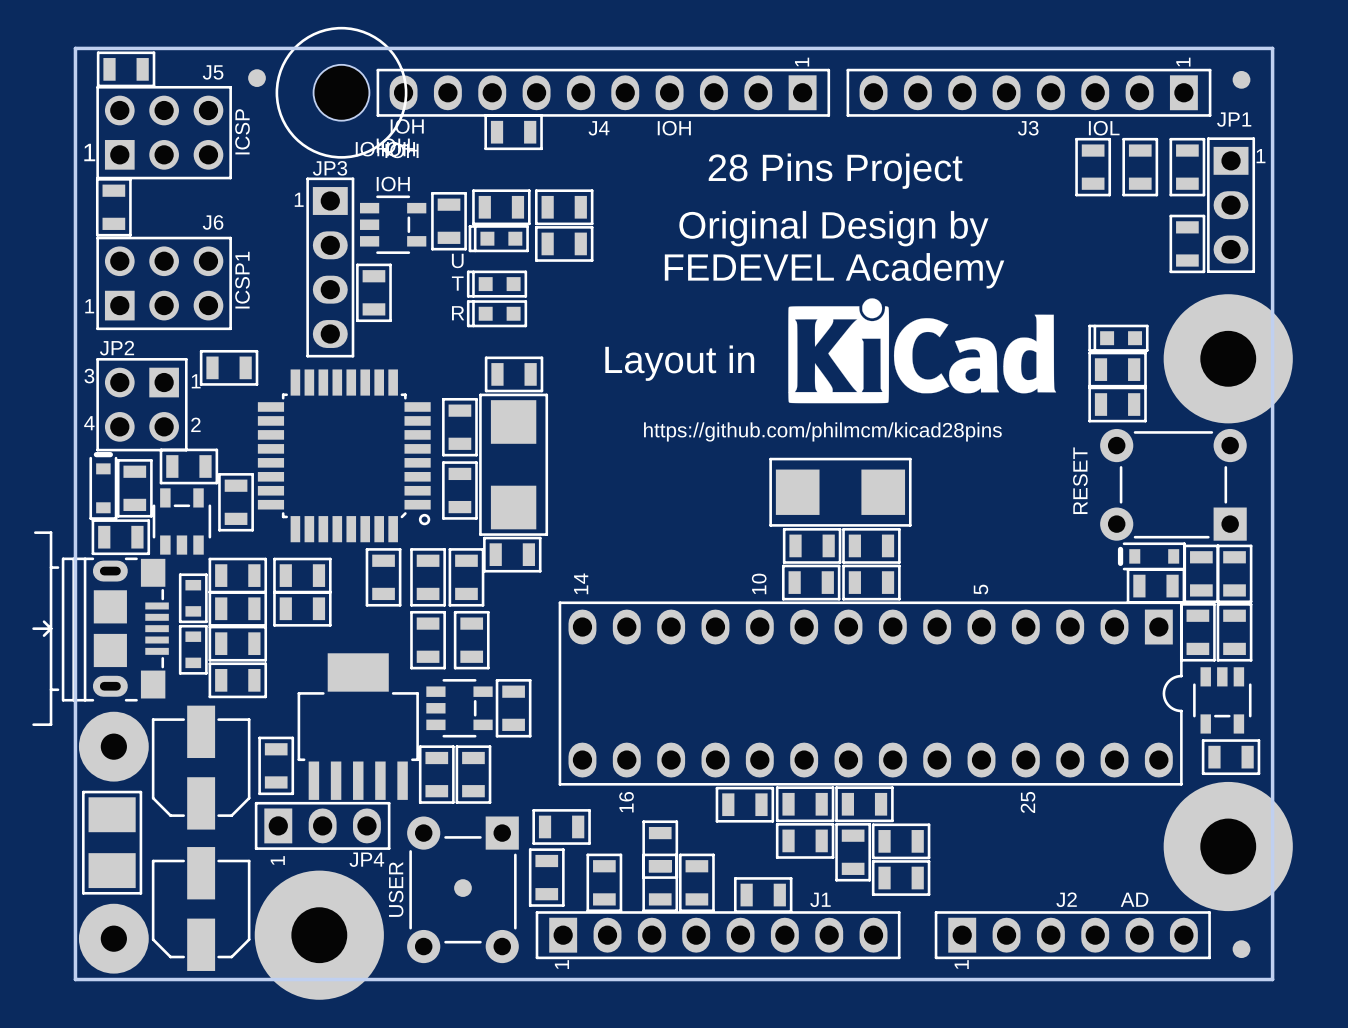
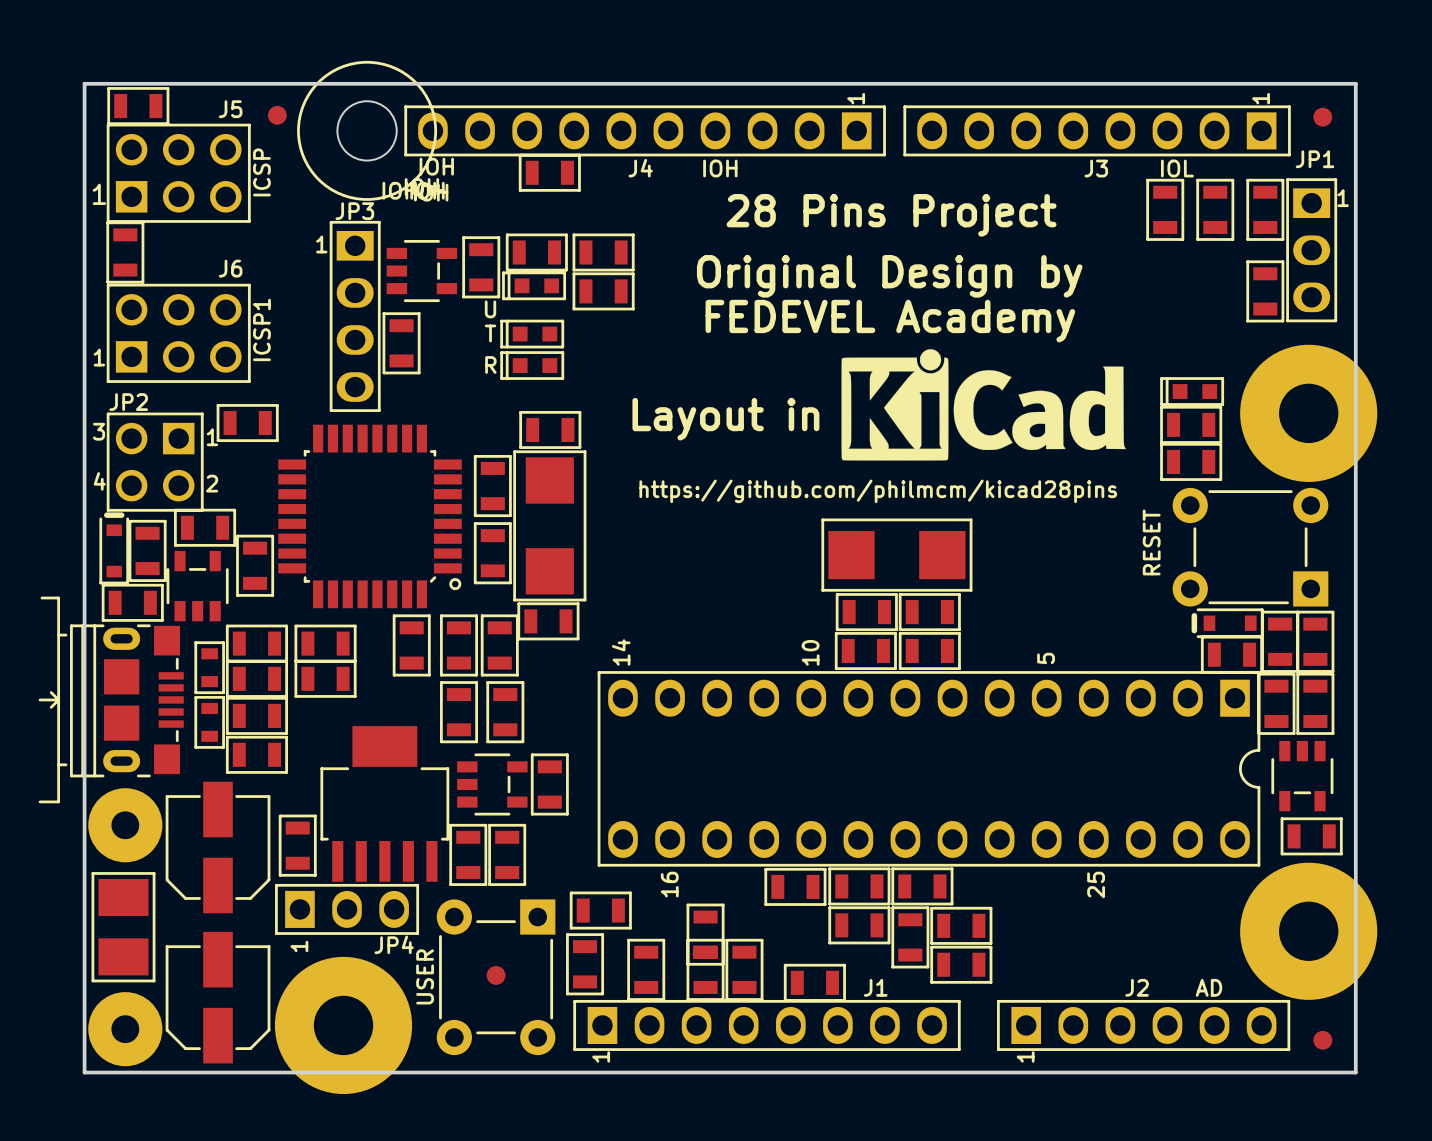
text: IOH (393, 184) -> none

